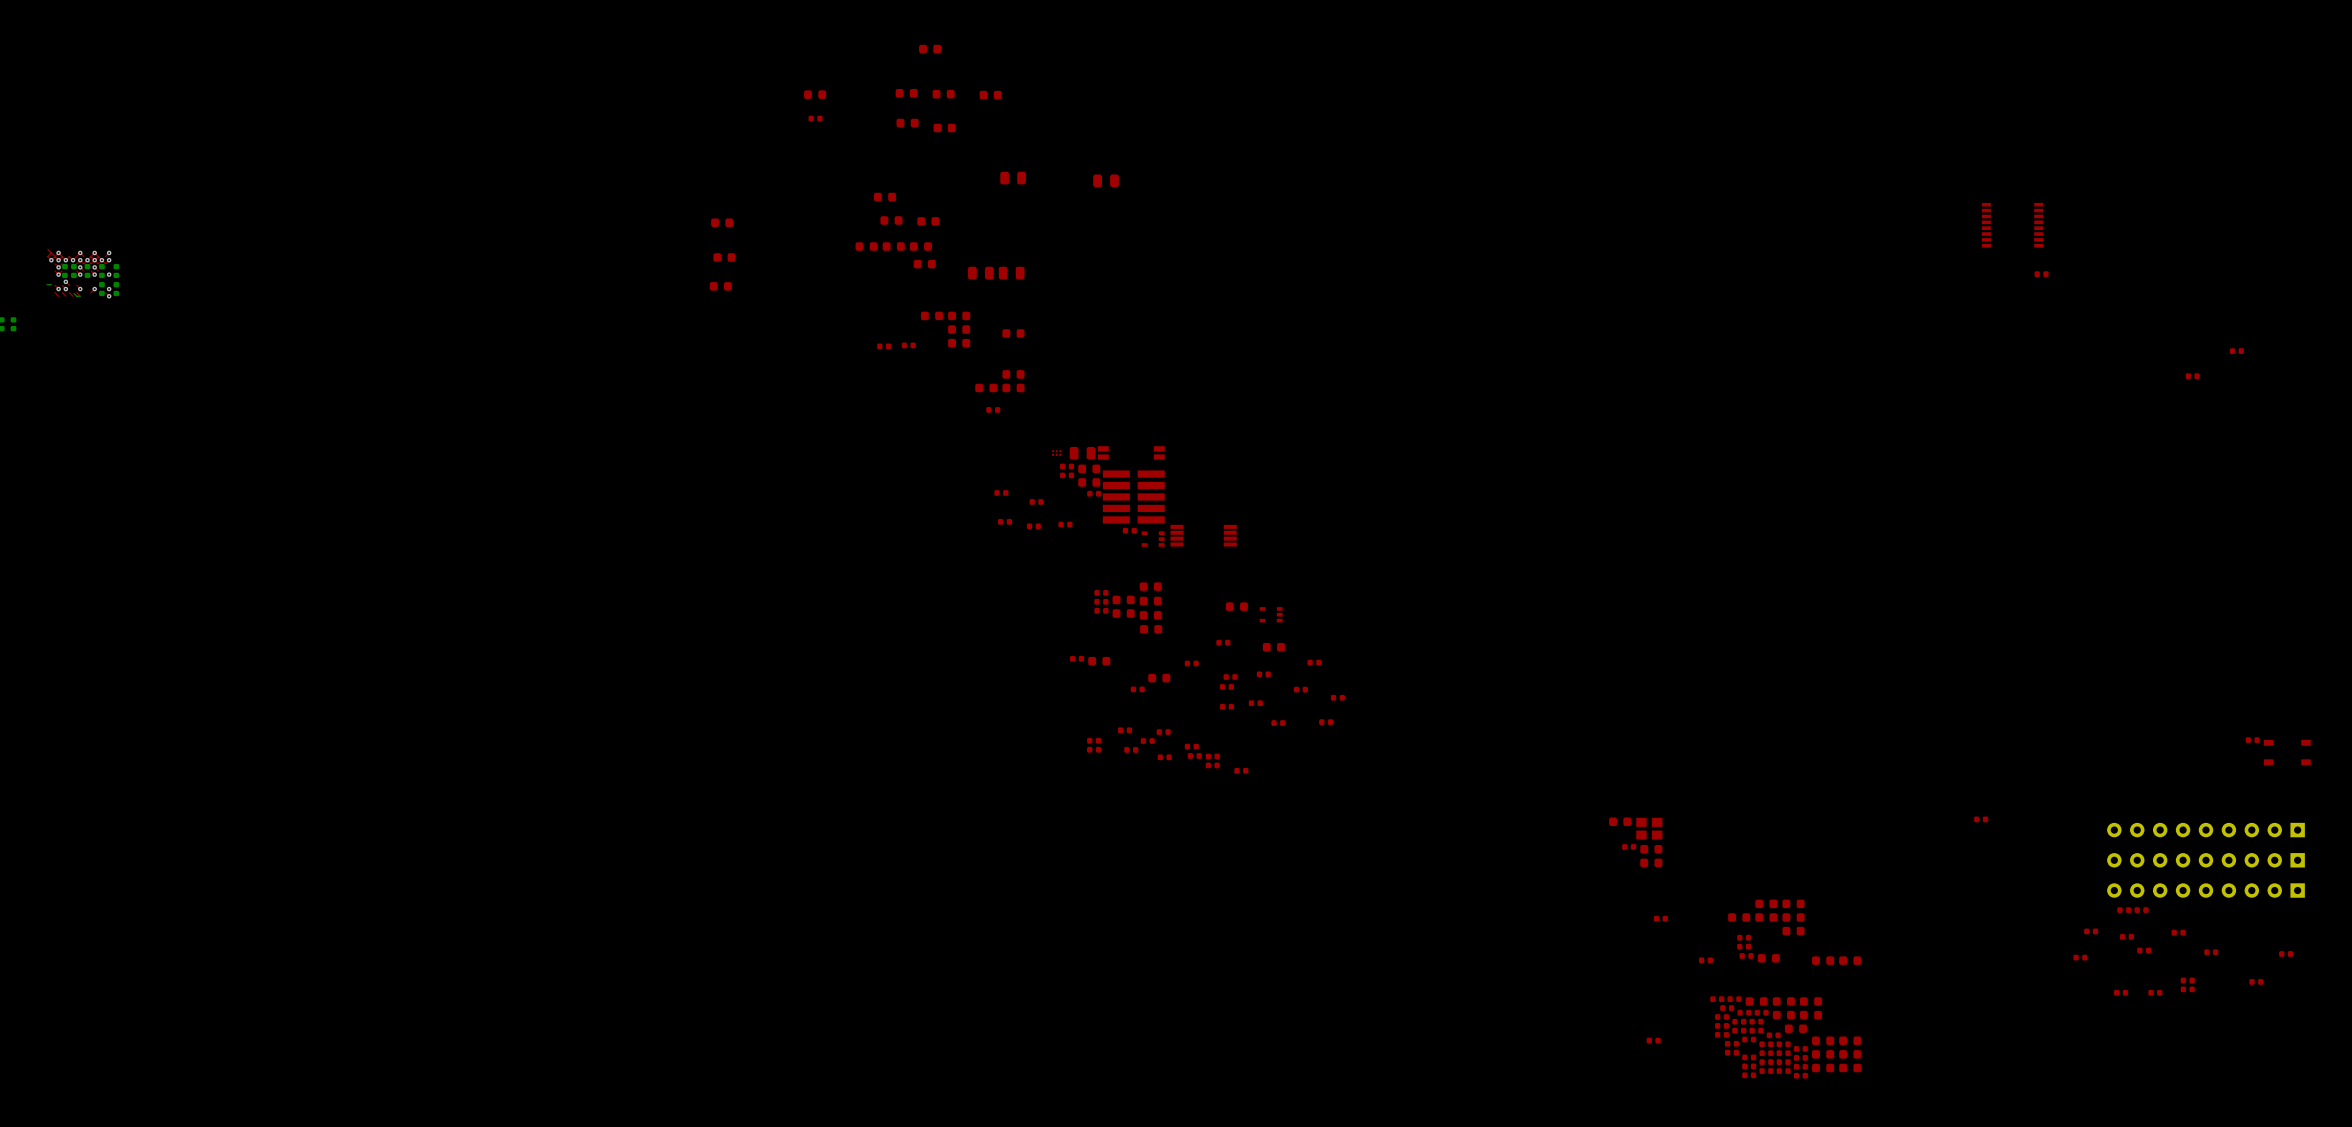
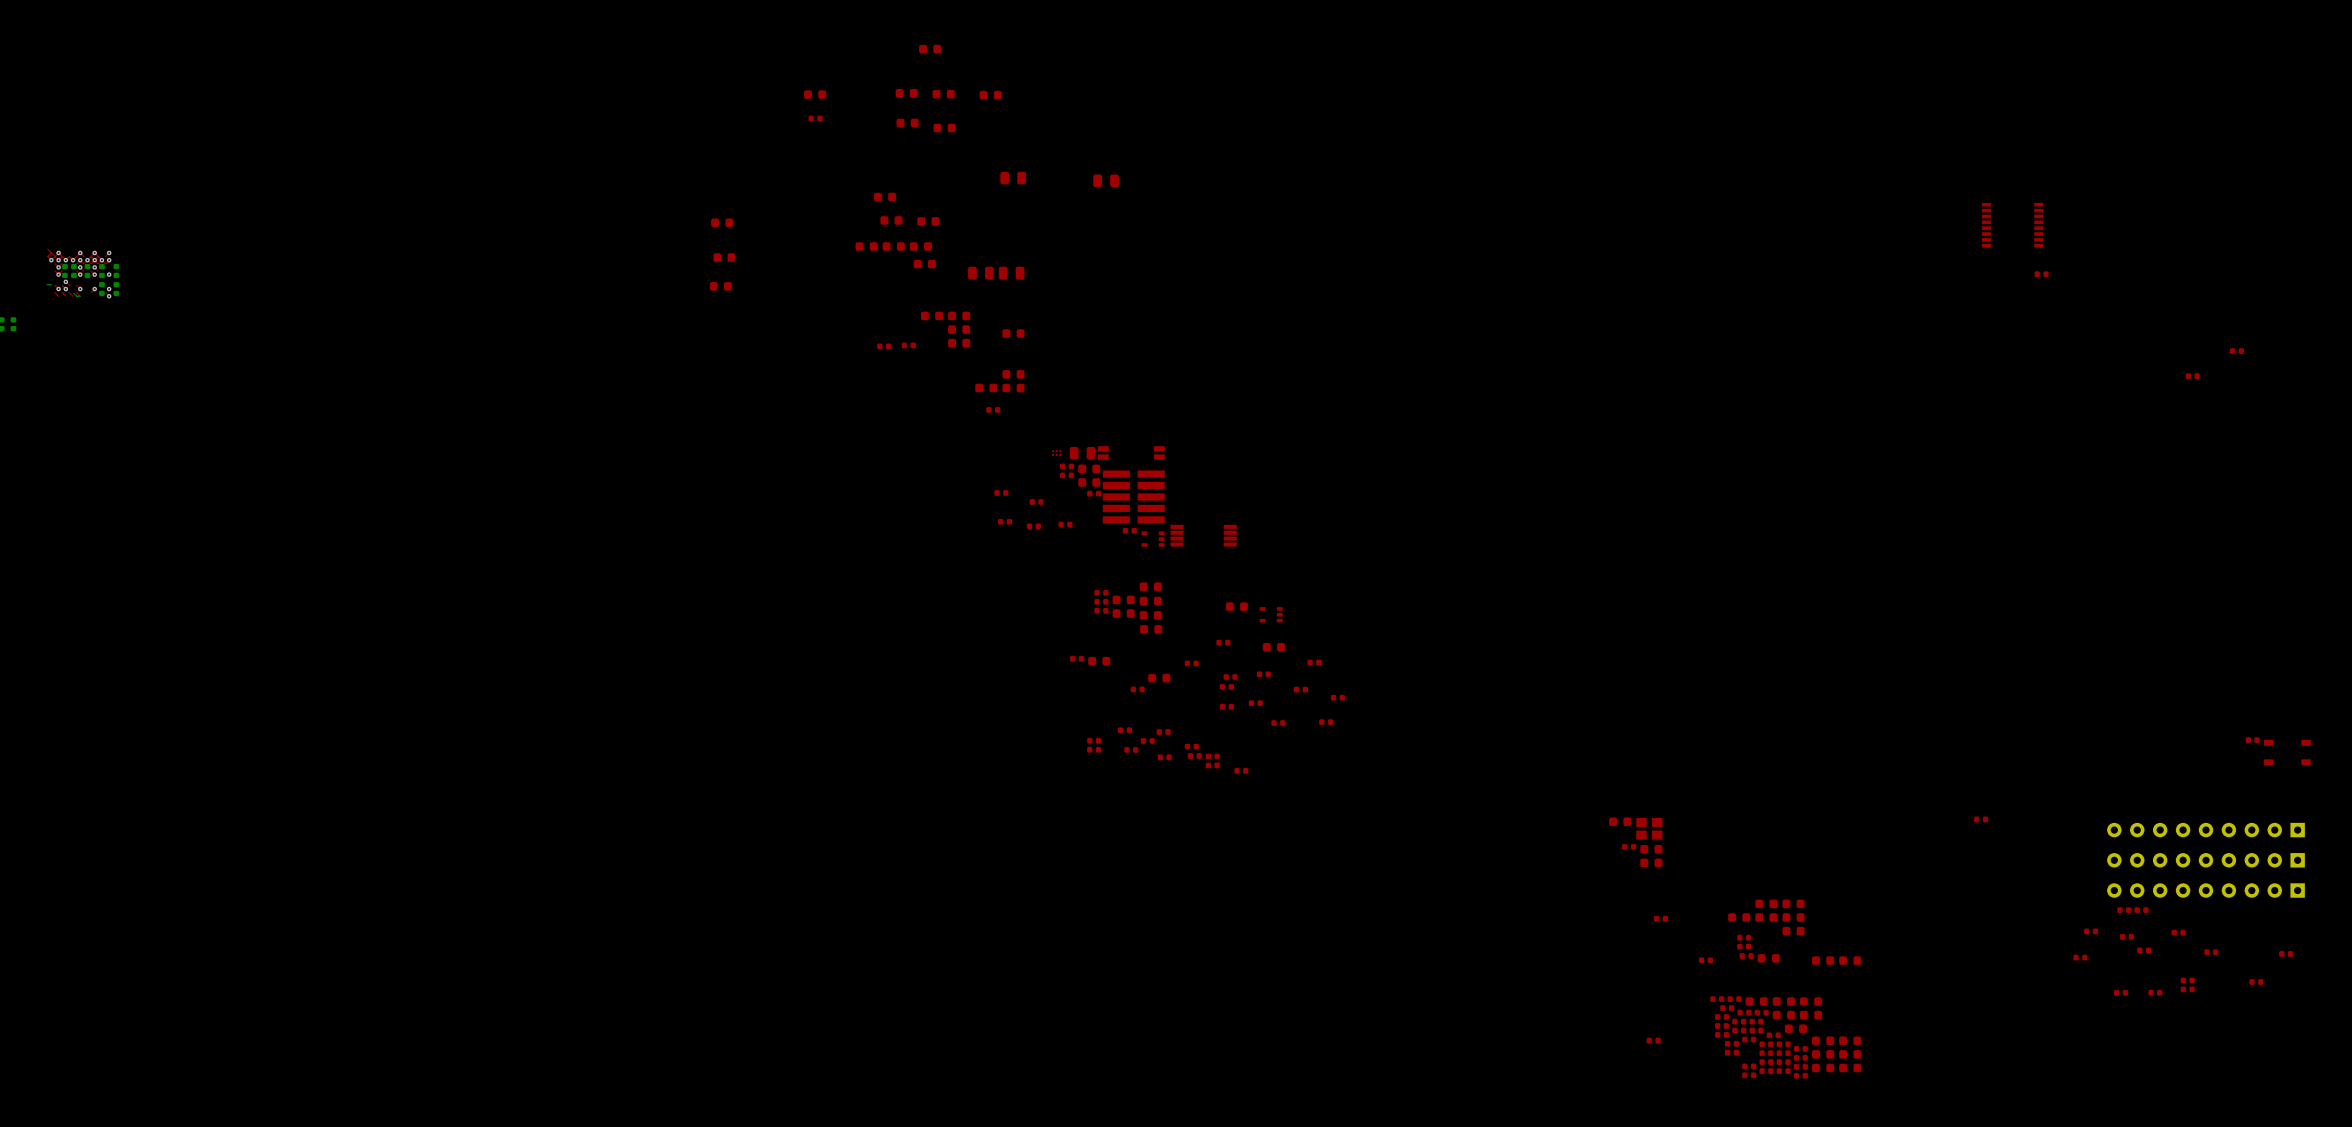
part: (1749, 1057) -> none

